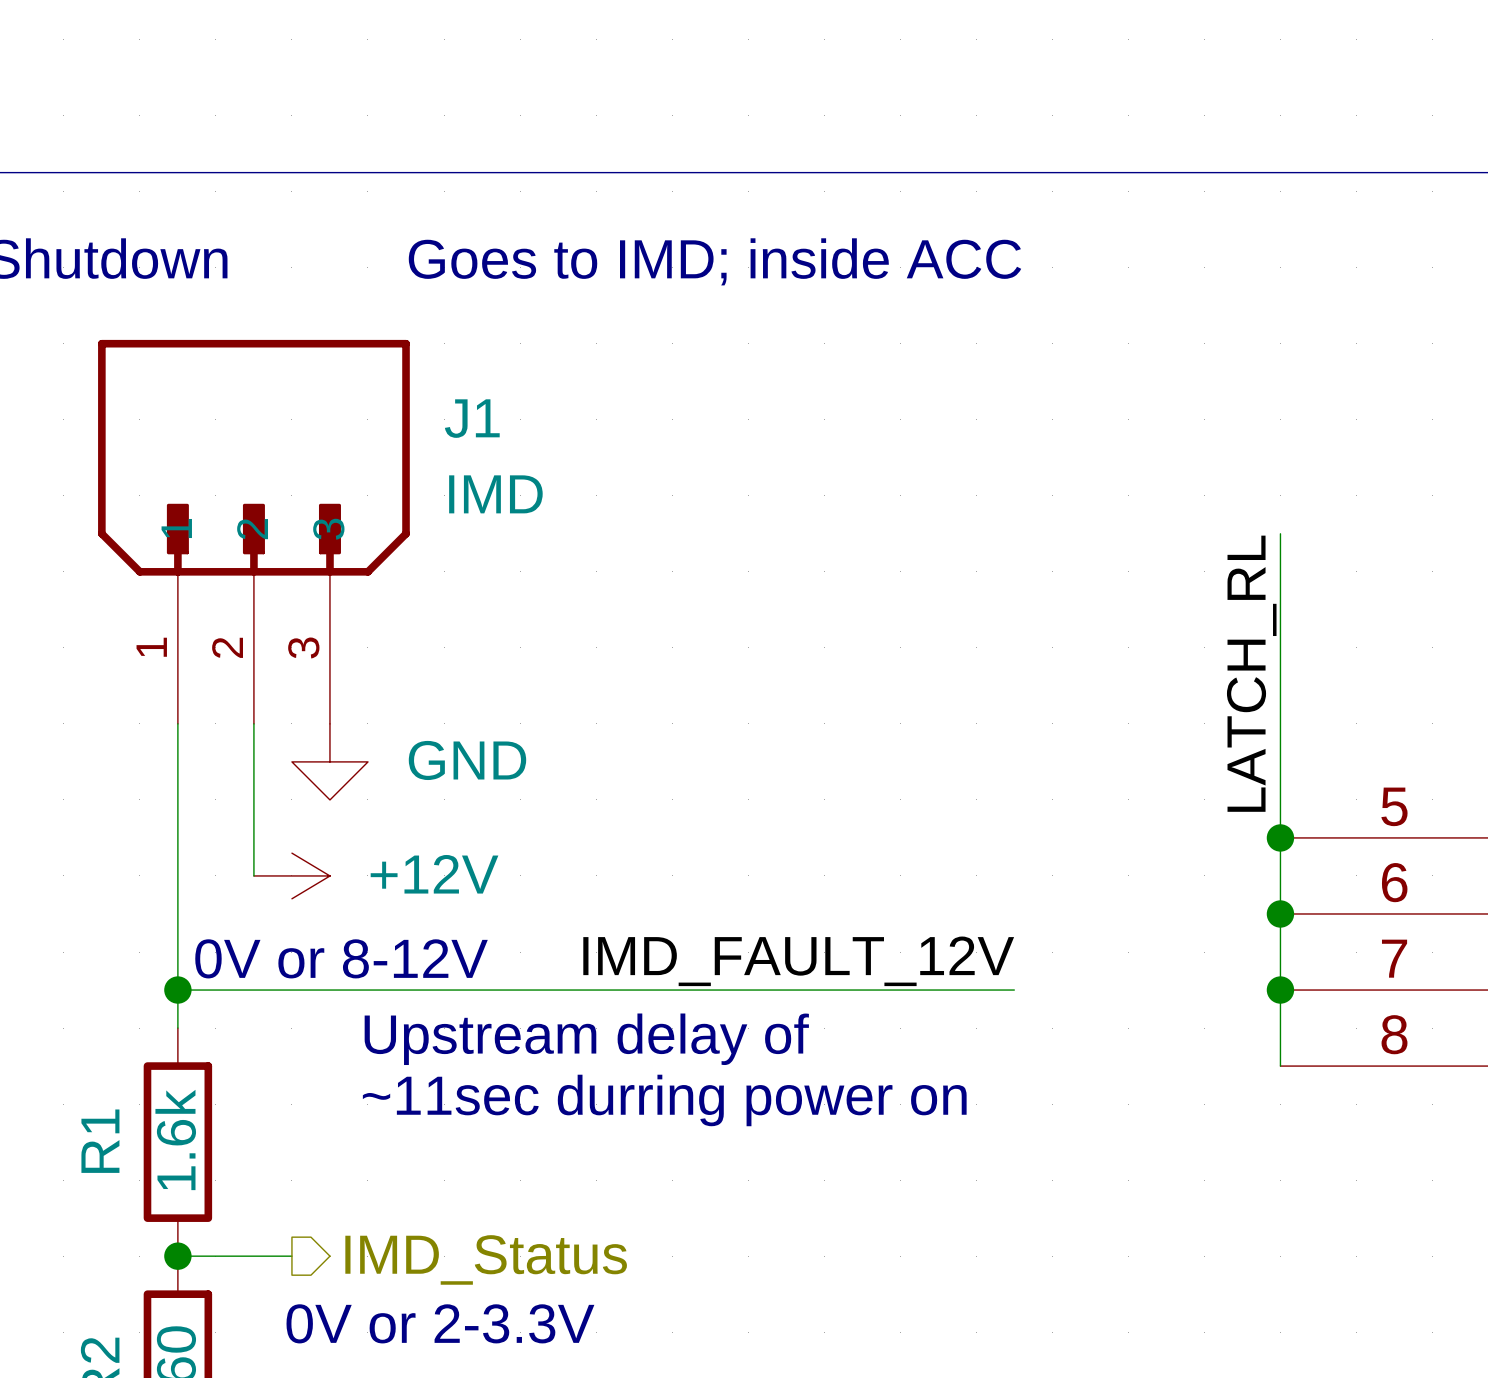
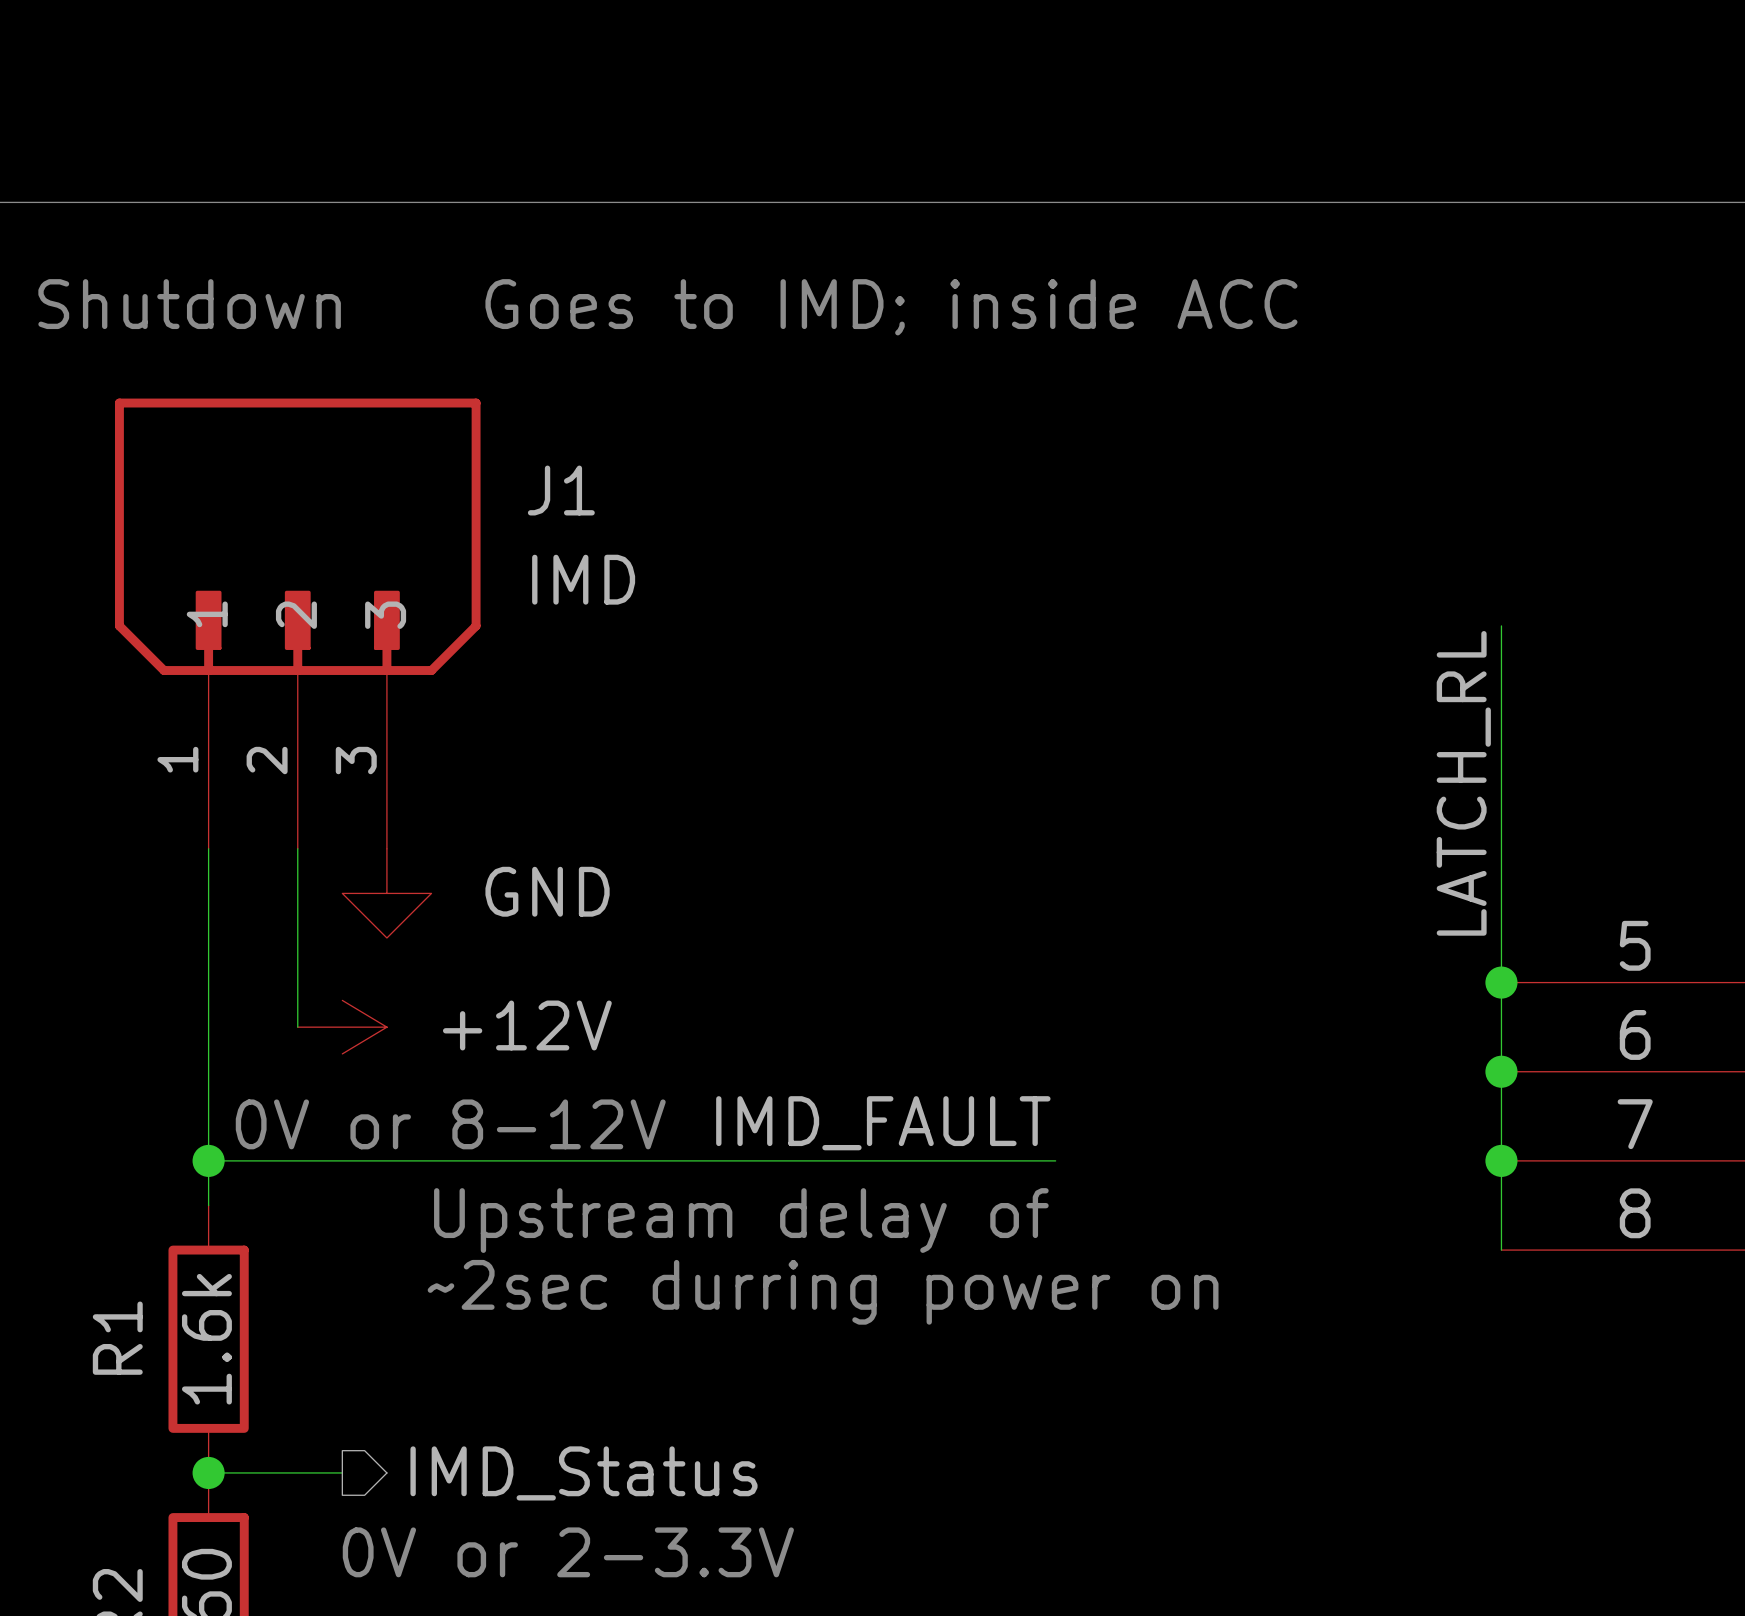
label: IMD_FAULT_12V (798, 961) -> IMD_FAULT (883, 1123)
wire: (900, 990) (1014, 990) -> none
text: ~11sec durring power on (664, 1100) -> ~2sec durring power on (823, 1292)

